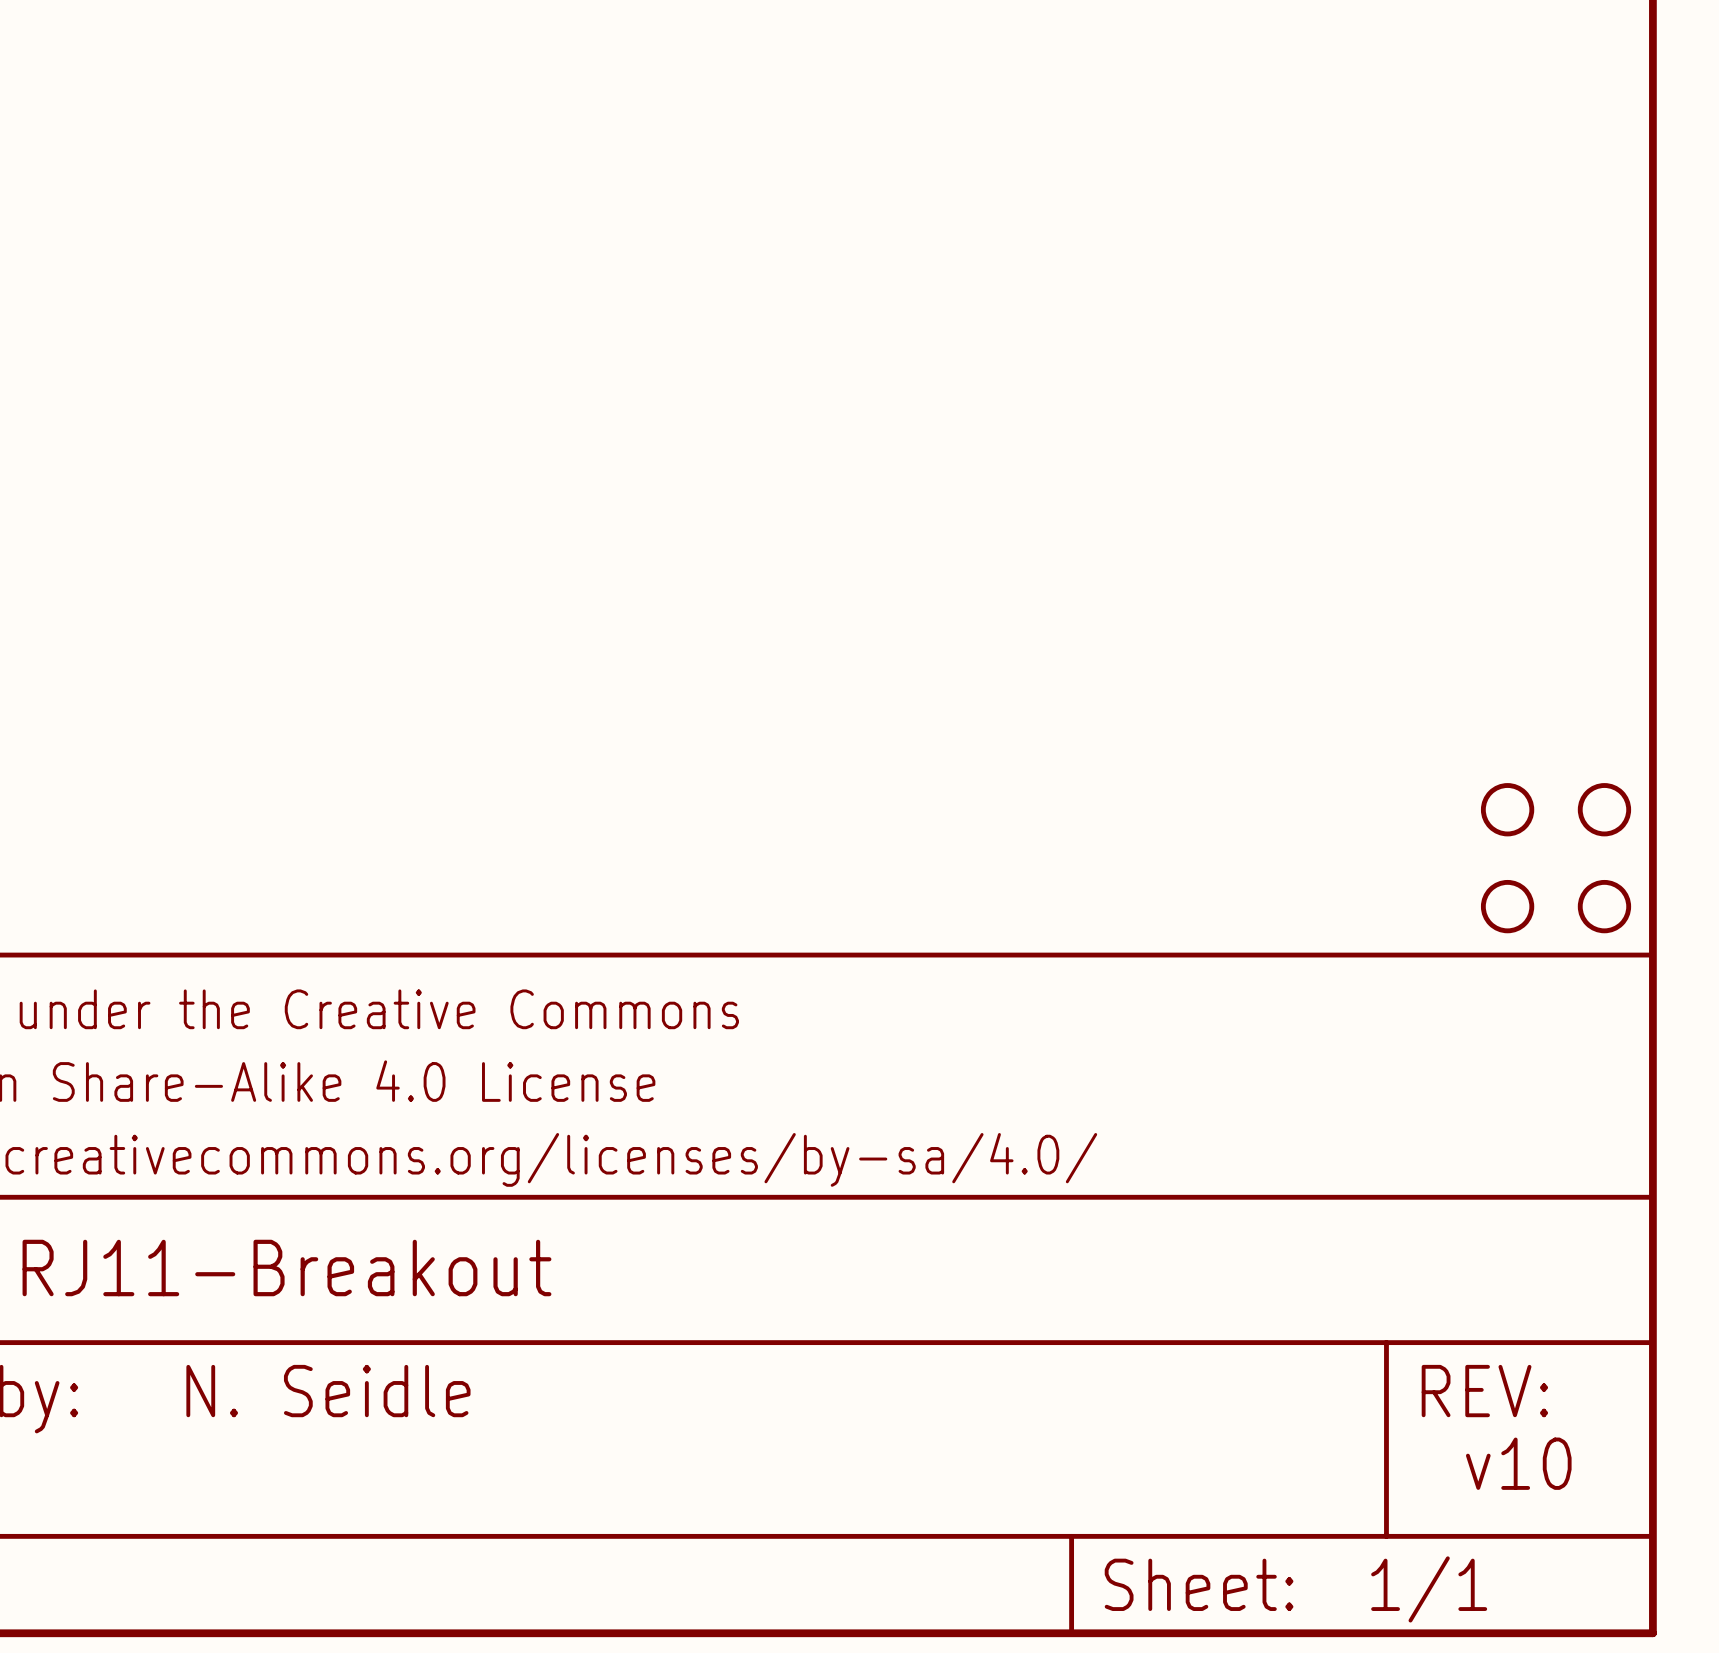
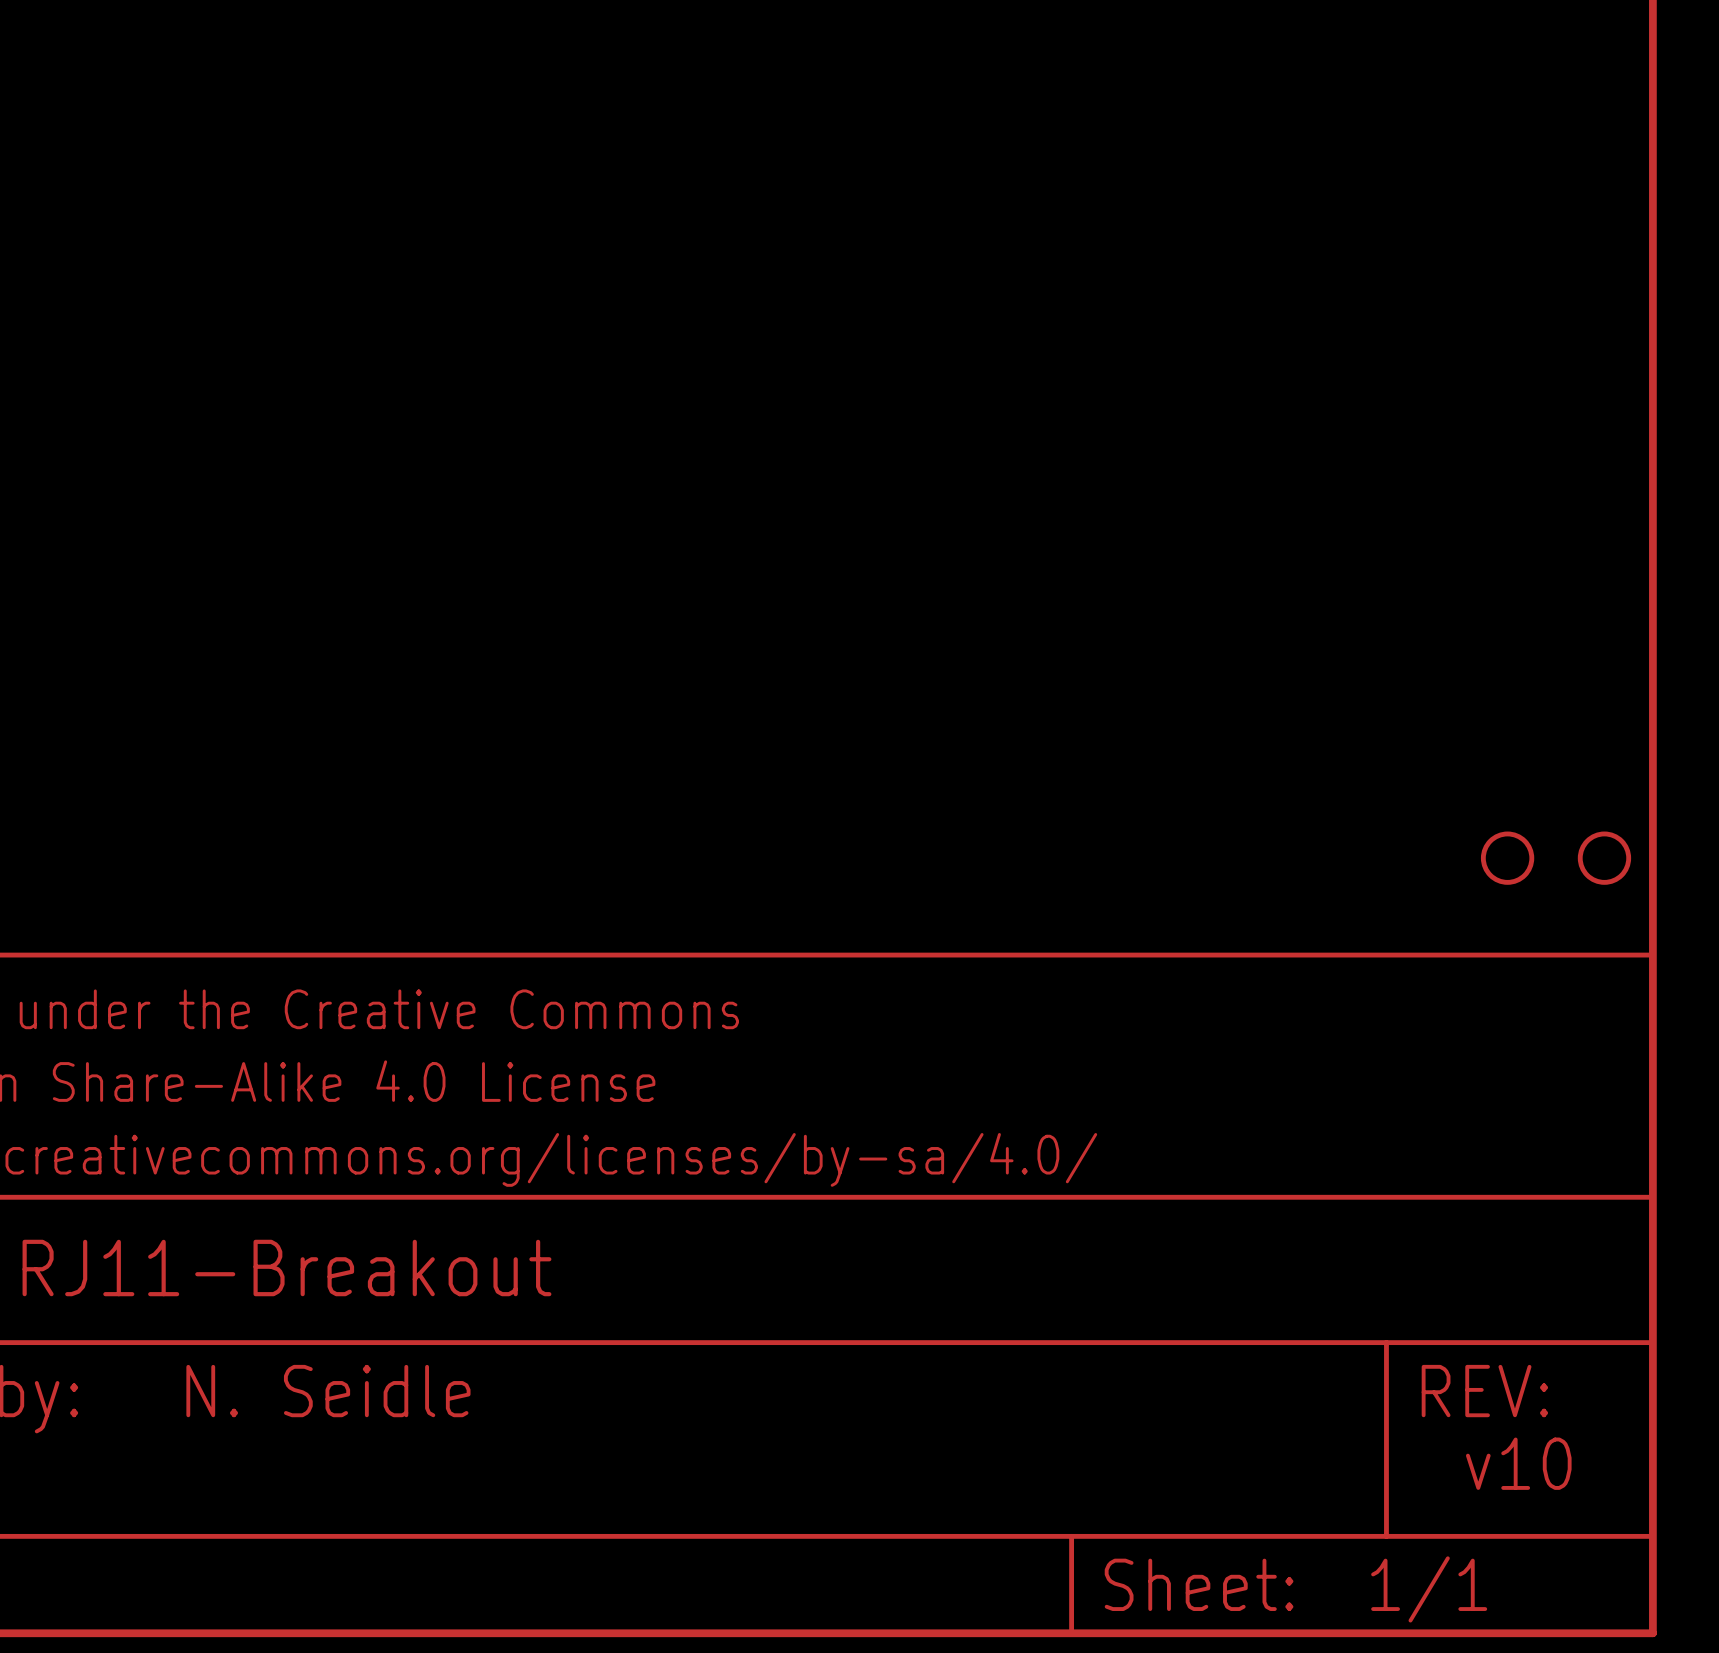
part: (1507, 809) -> none
part: (1604, 809) -> none
part: none -> (1507, 858)
part: none -> (1604, 858)
part: (1507, 906) -> none
part: (1604, 906) -> none

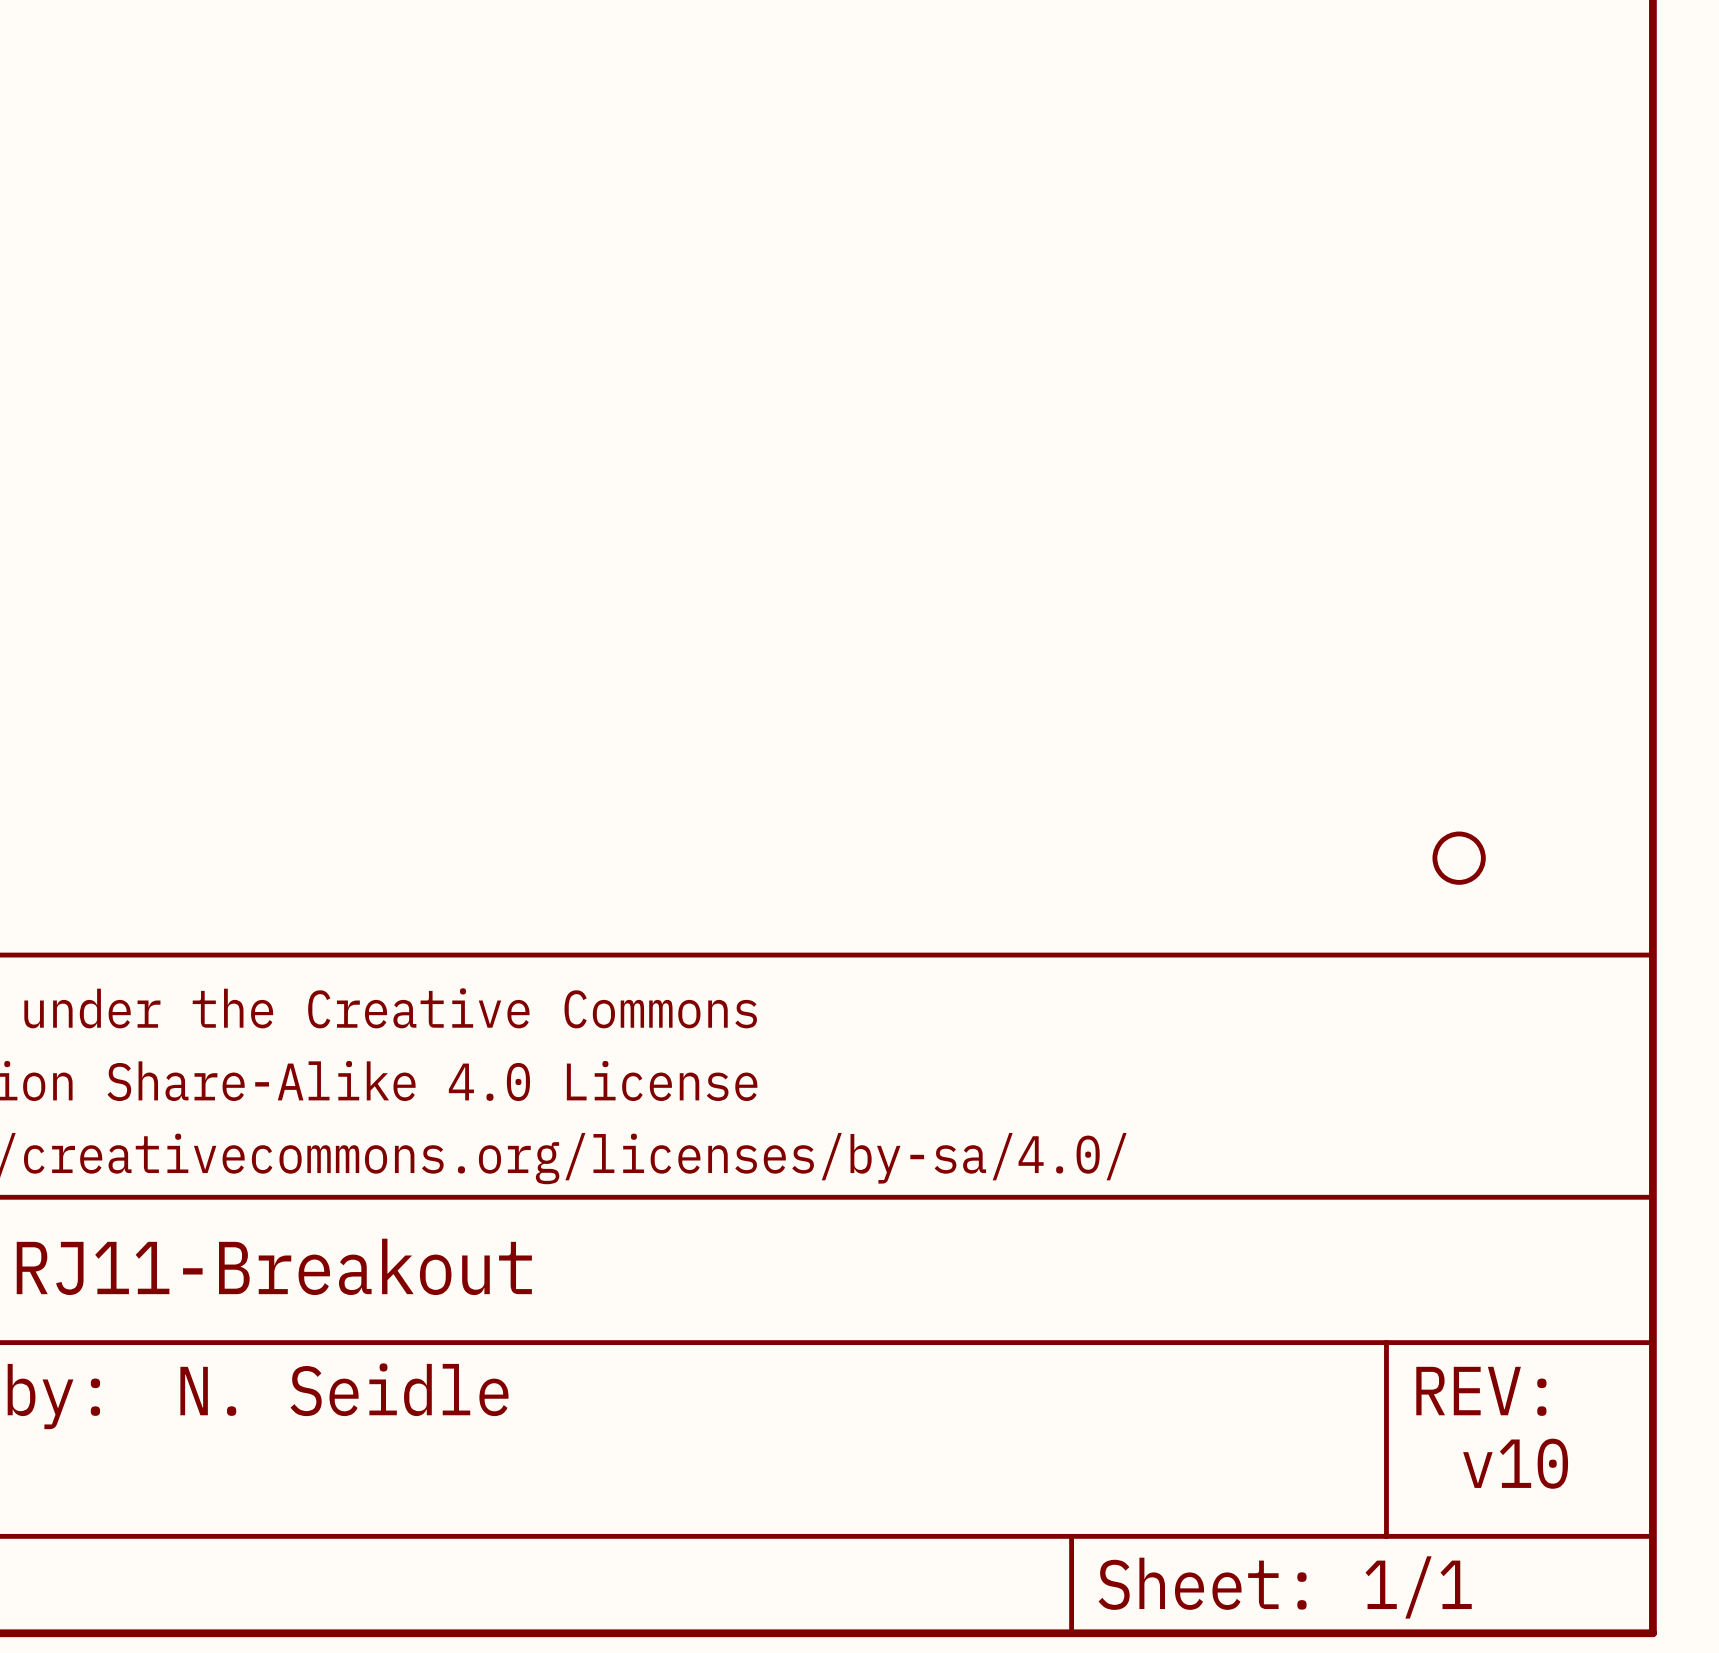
part position: (1507, 858) -> (1459, 858)
part: (1604, 858) -> none

